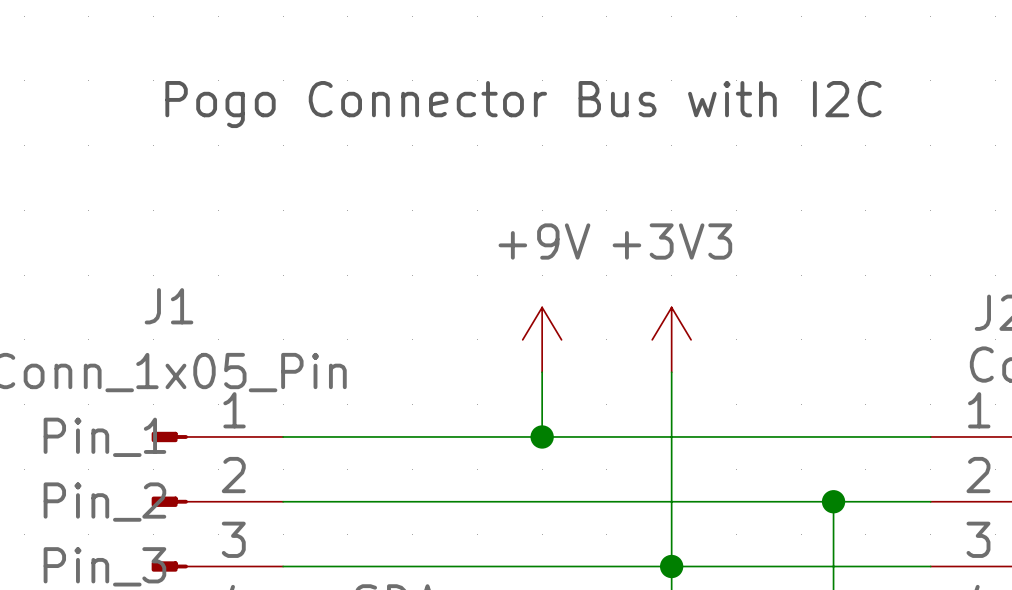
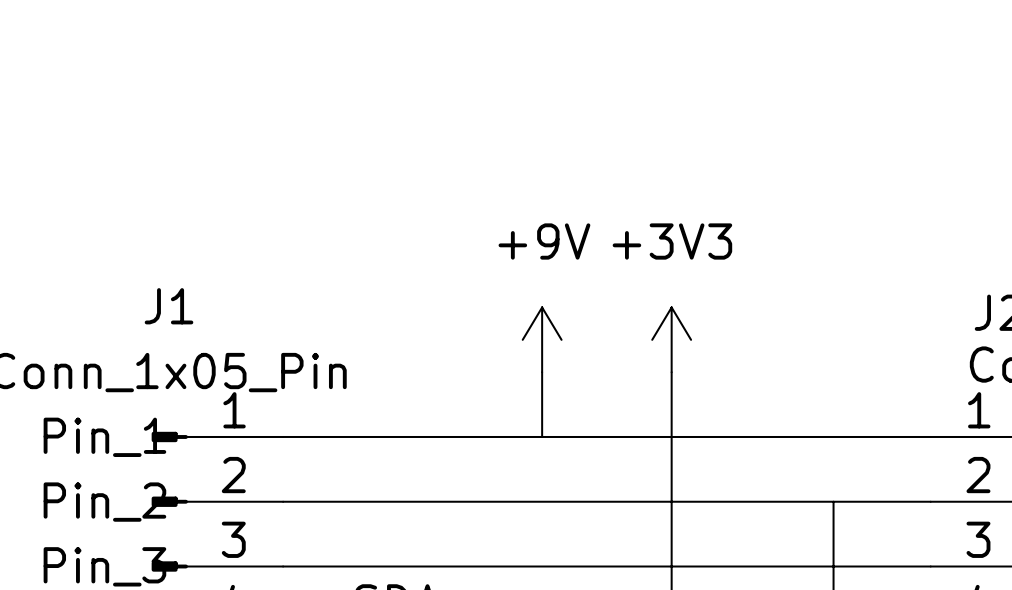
text: Pogo Connector Bus with I2C (523, 104) -> none
junction: (542, 436) -> none
junction: (833, 501) -> none
junction: (671, 566) -> none

